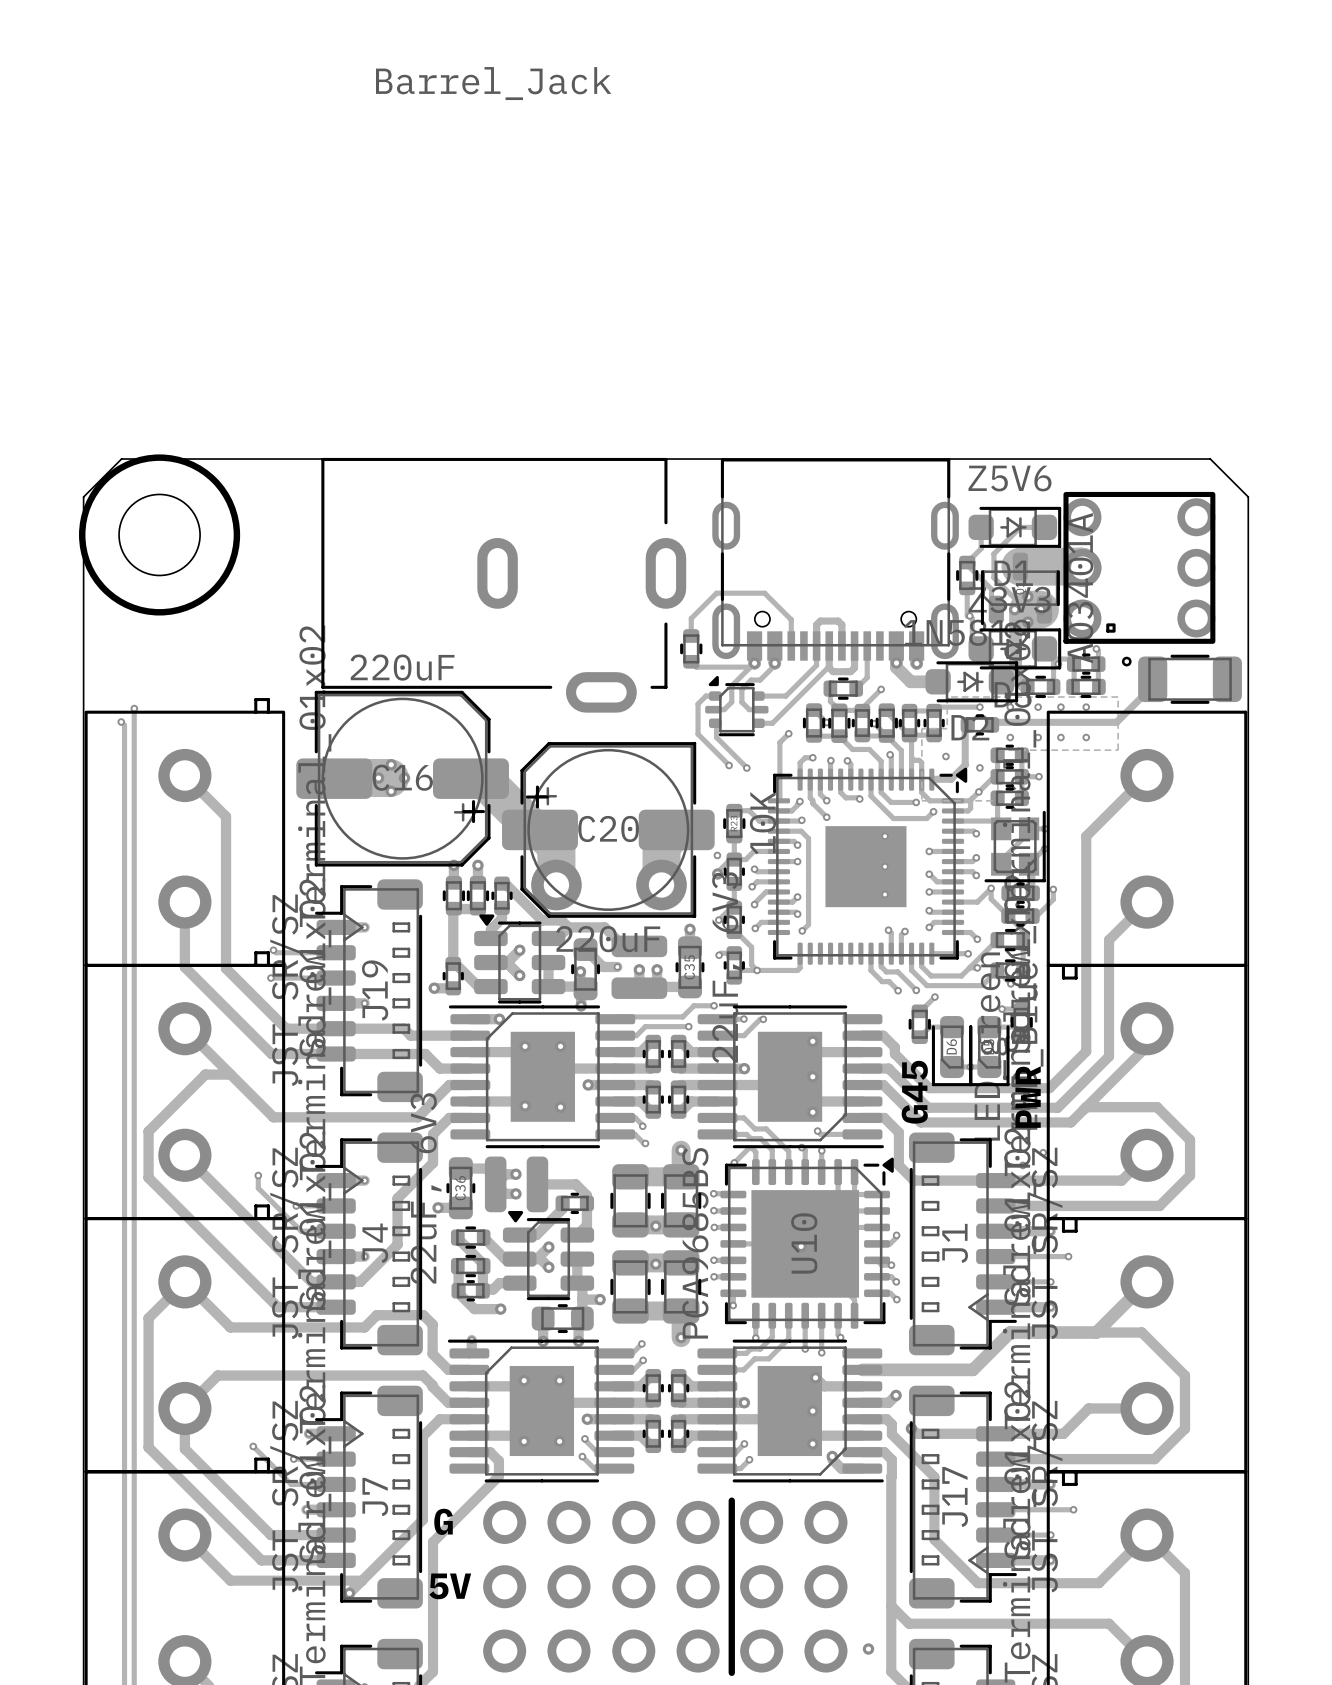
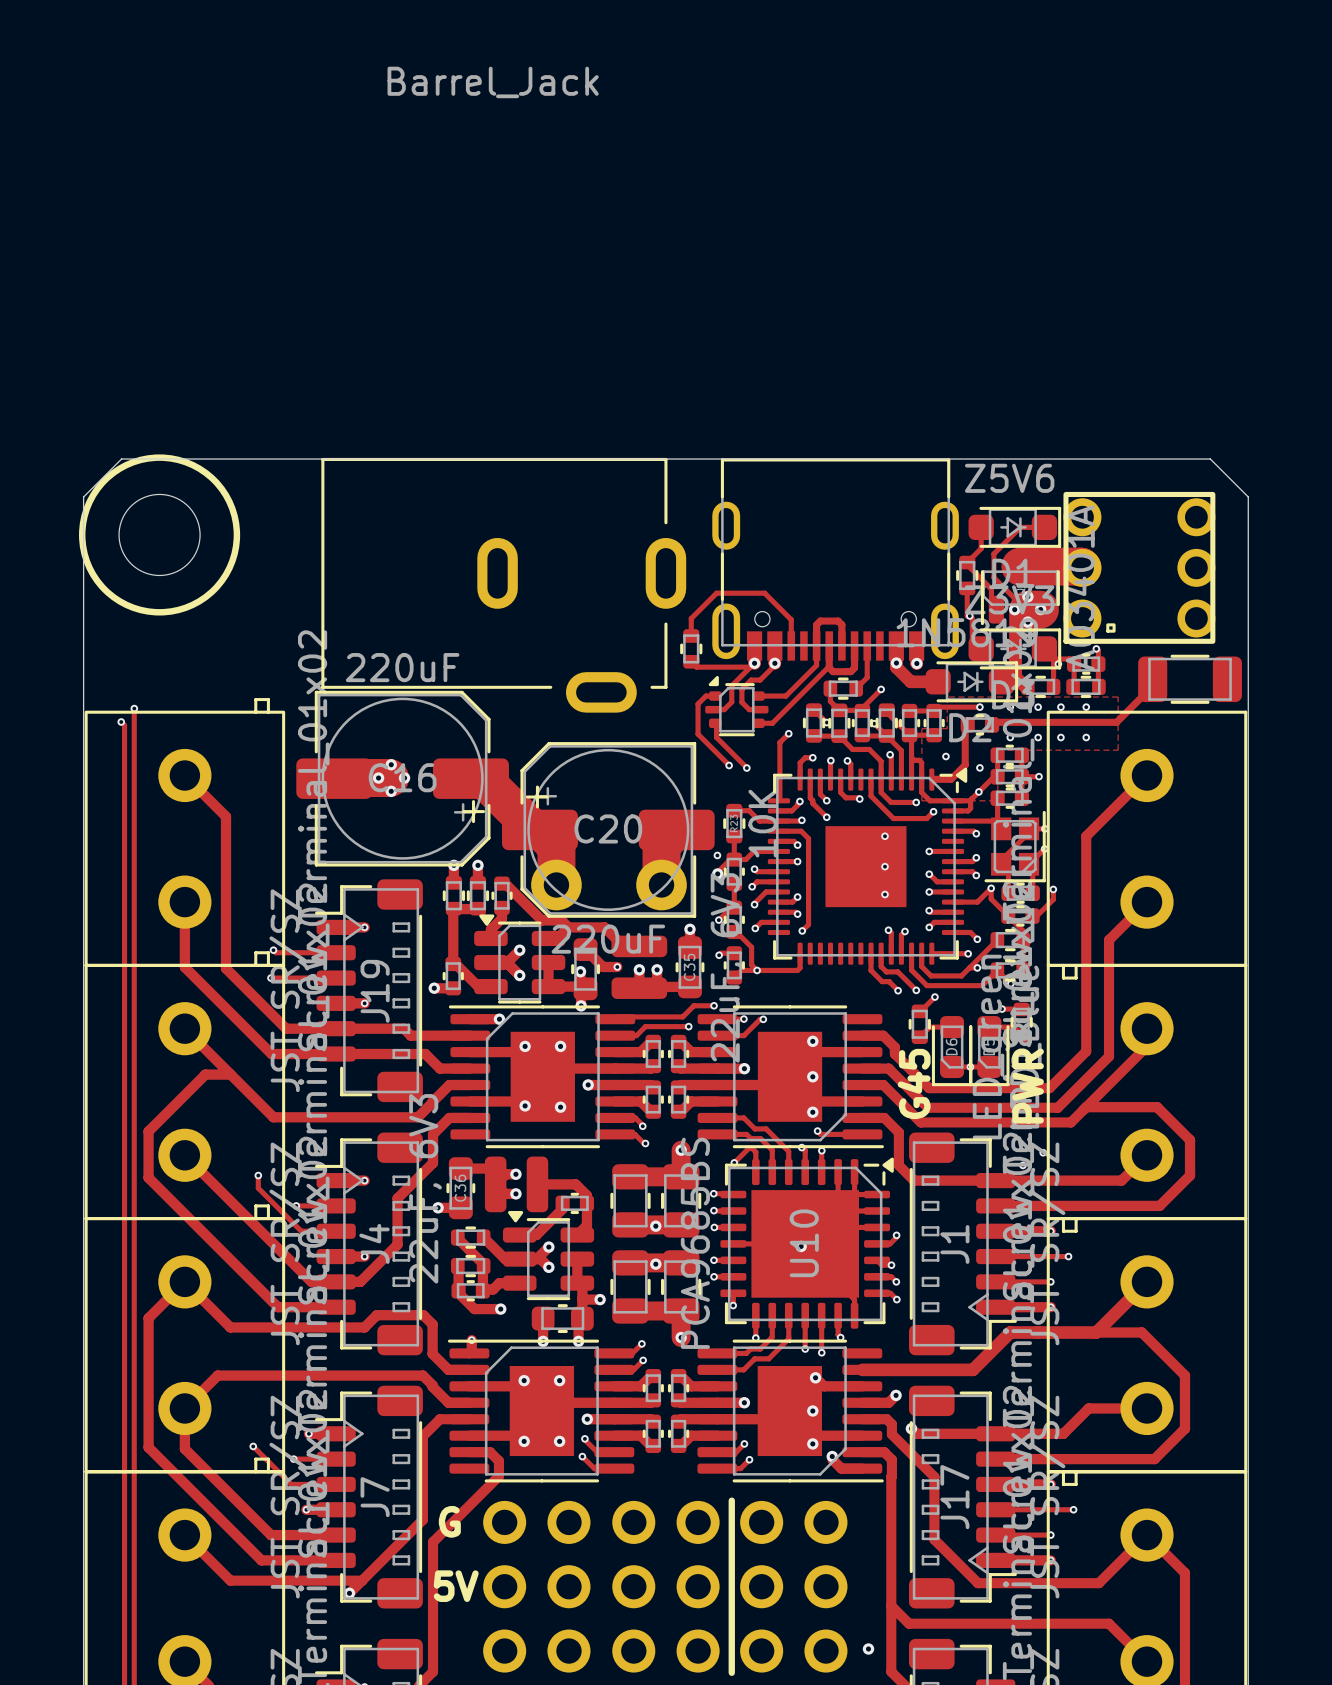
drawing: [1121, 656, 1132, 667] -> none

